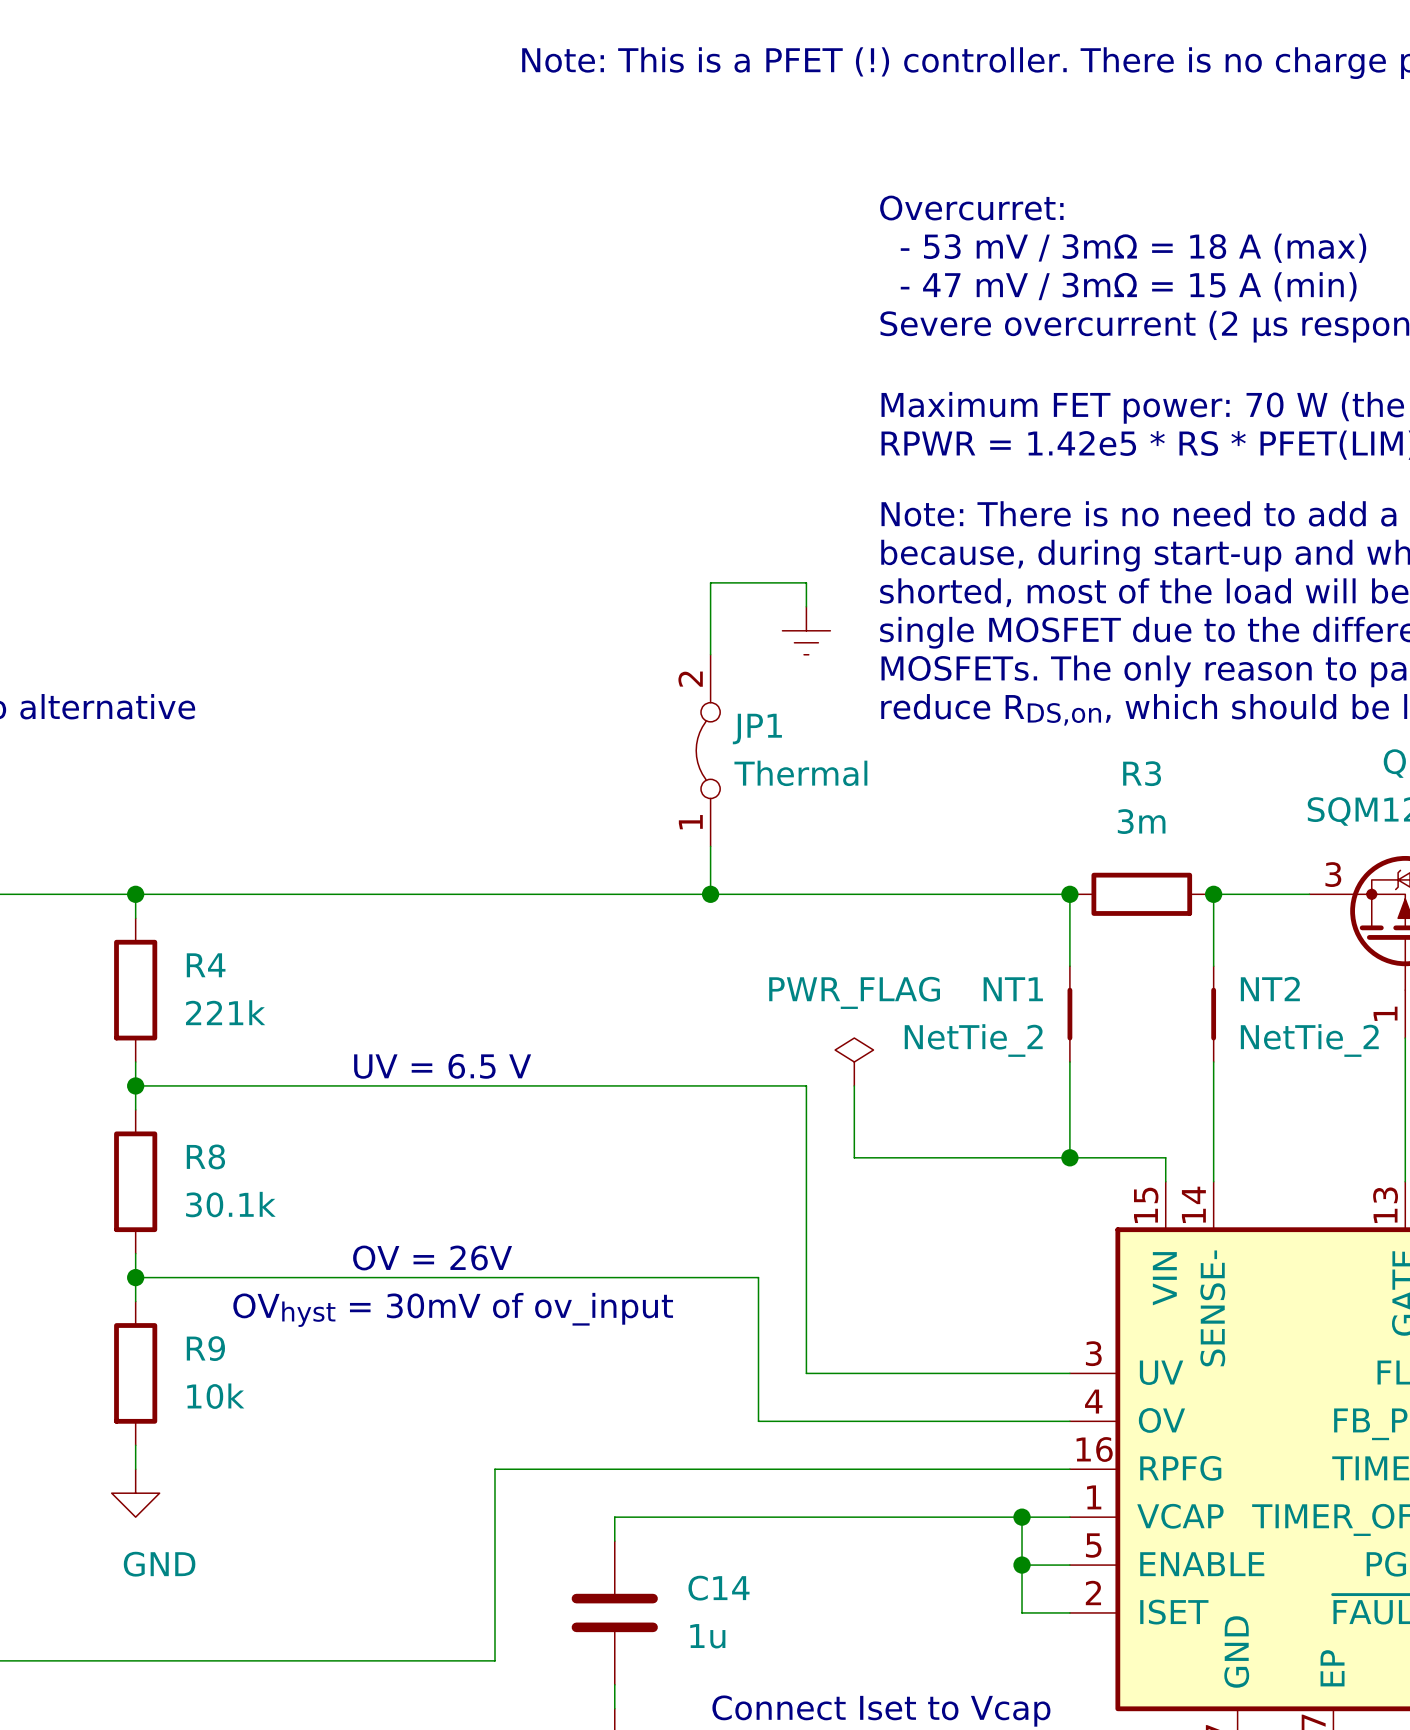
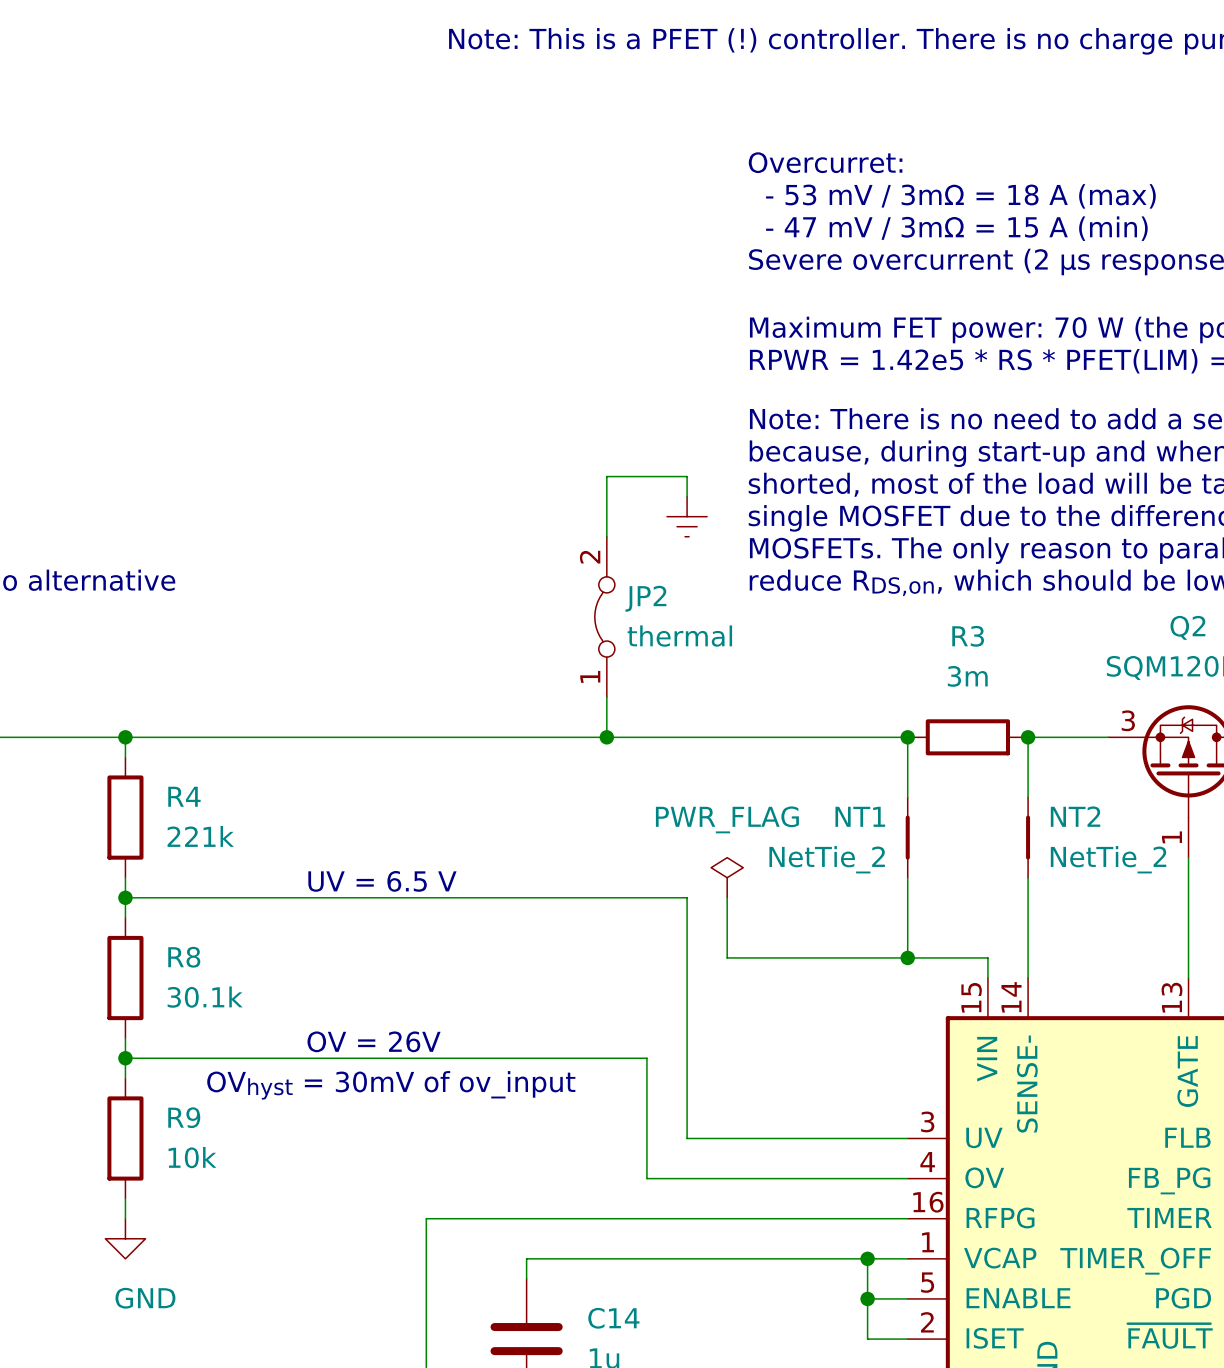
JP1 name: JP1 (757, 729) -> JP2 (645, 598)
JP1 value: Thermal (800, 773) -> thermal (679, 636)
part pin name: RPFG (1180, 1468) -> RFPG (1000, 1217)

